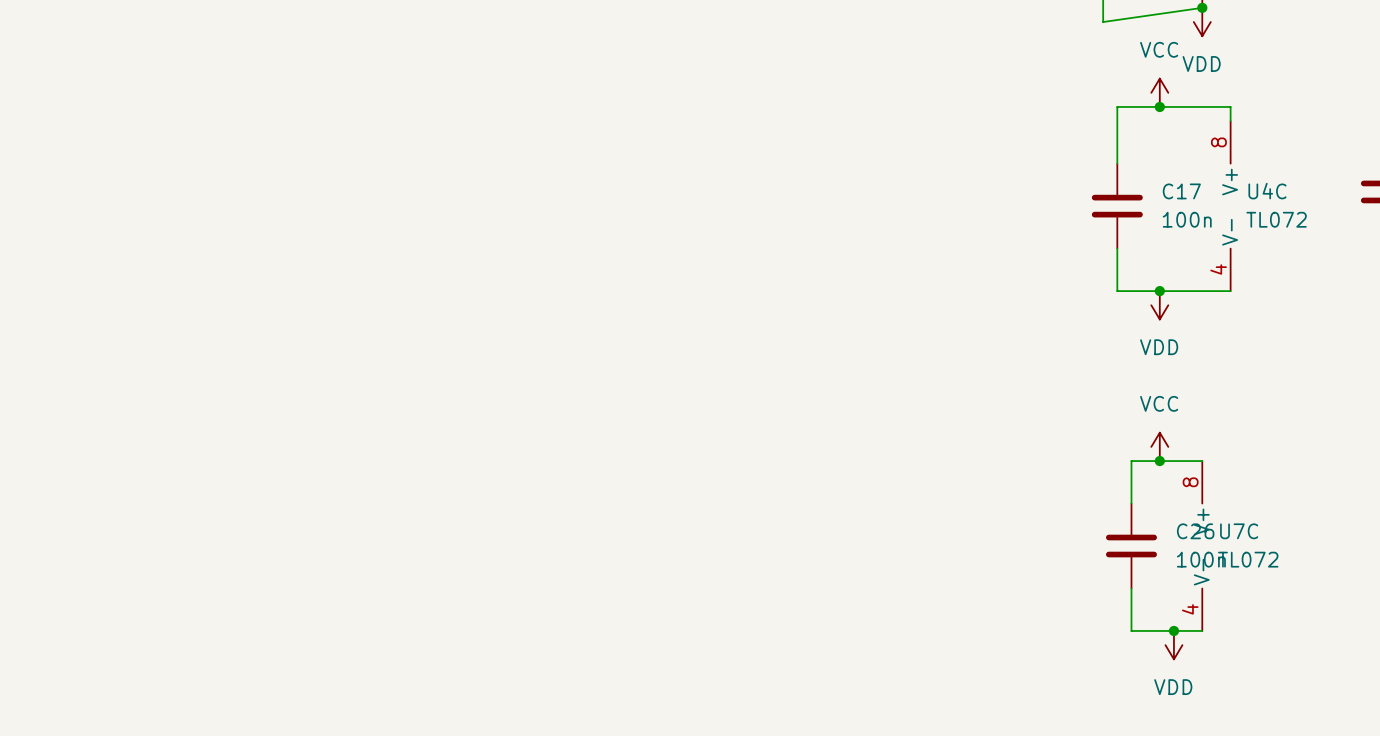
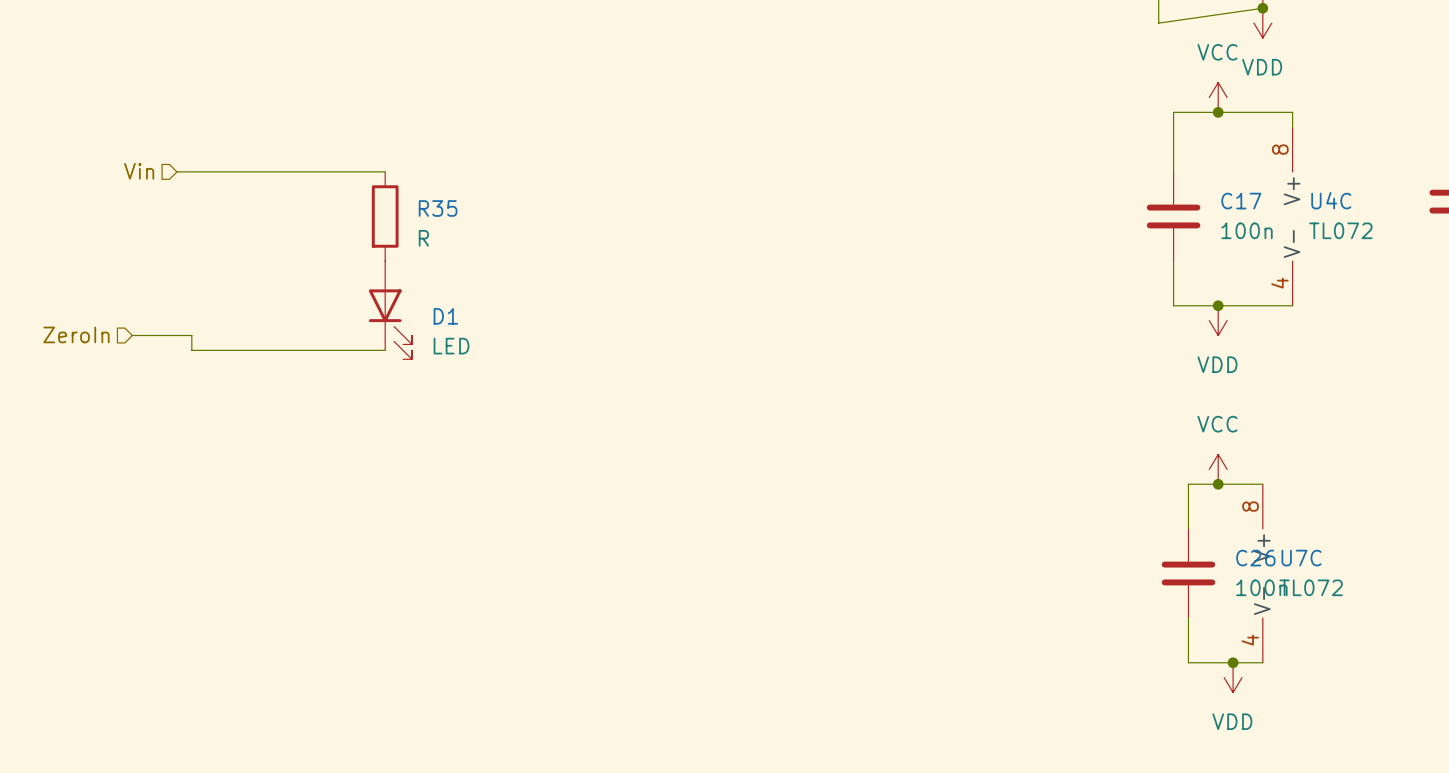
hierarchical label: none -> Vin (139, 171)
wire: none -> (176, 171) (385, 171)
R35: none -> R (385, 216)
D1: none -> LED (390, 310)
hierarchical label: none -> ZeroIn (76, 334)
wire: none -> (132, 335) (191, 335) (191, 350) (385, 350)

